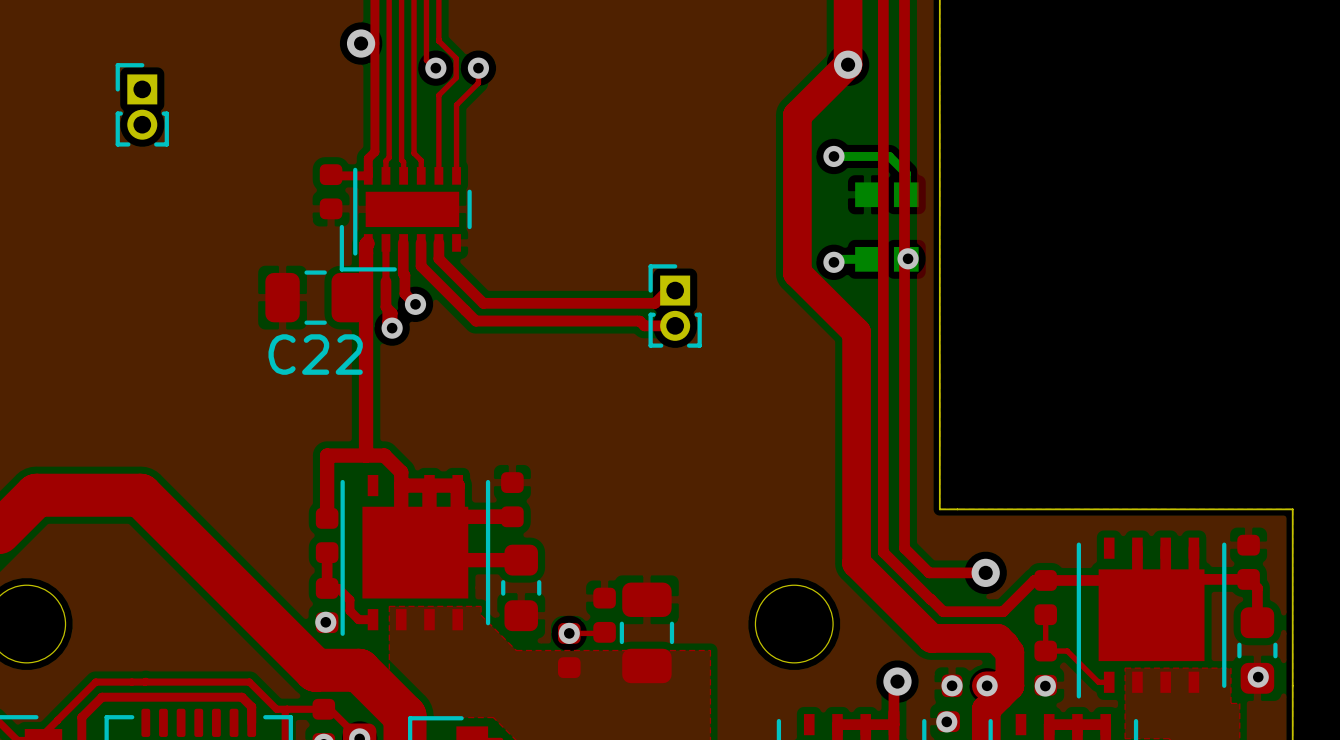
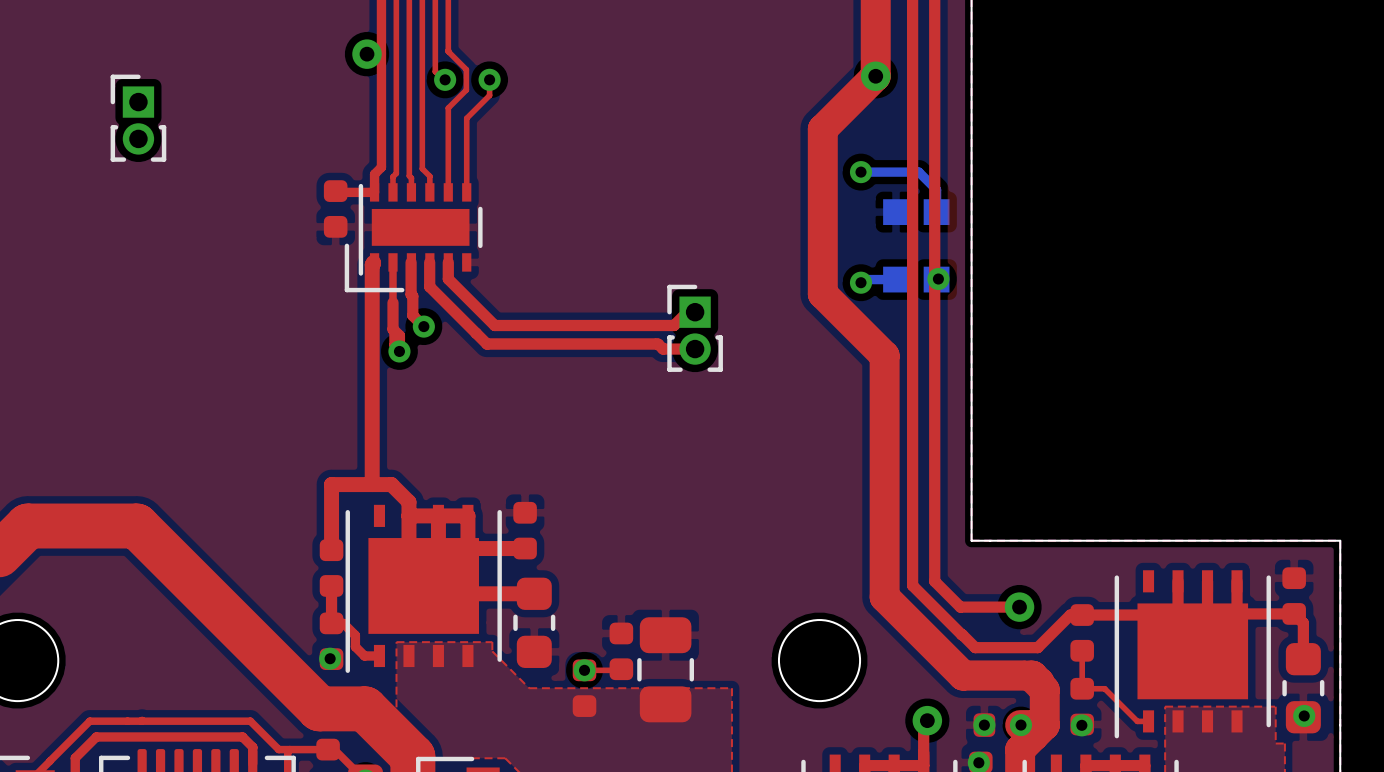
C22: (315, 297) -> none

